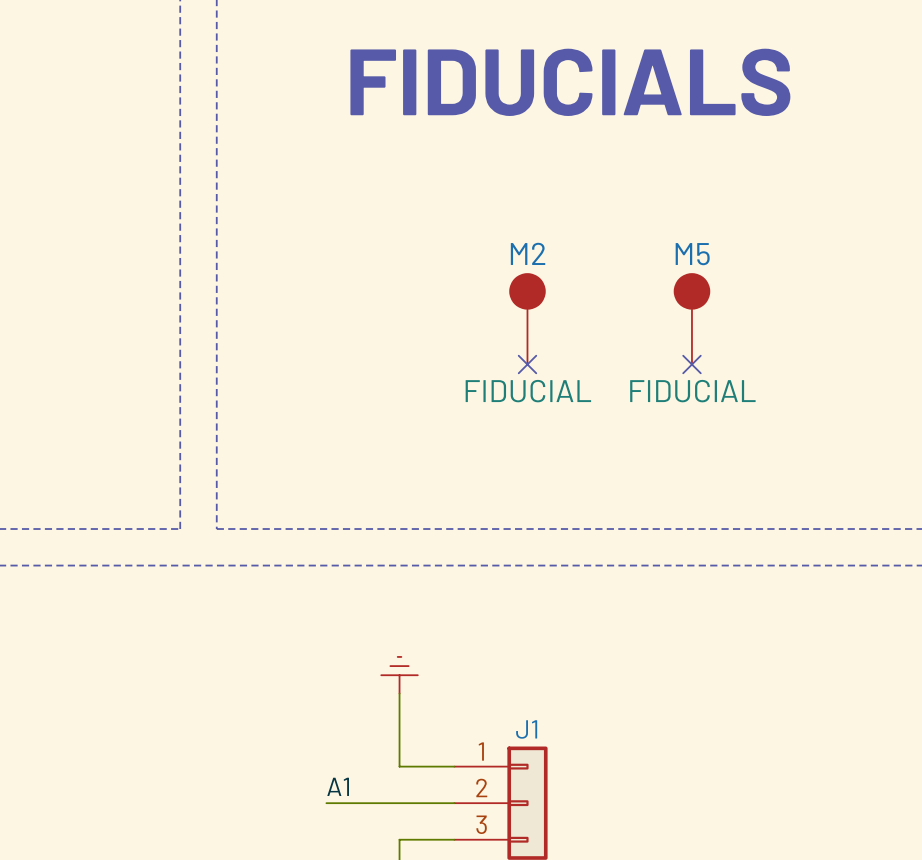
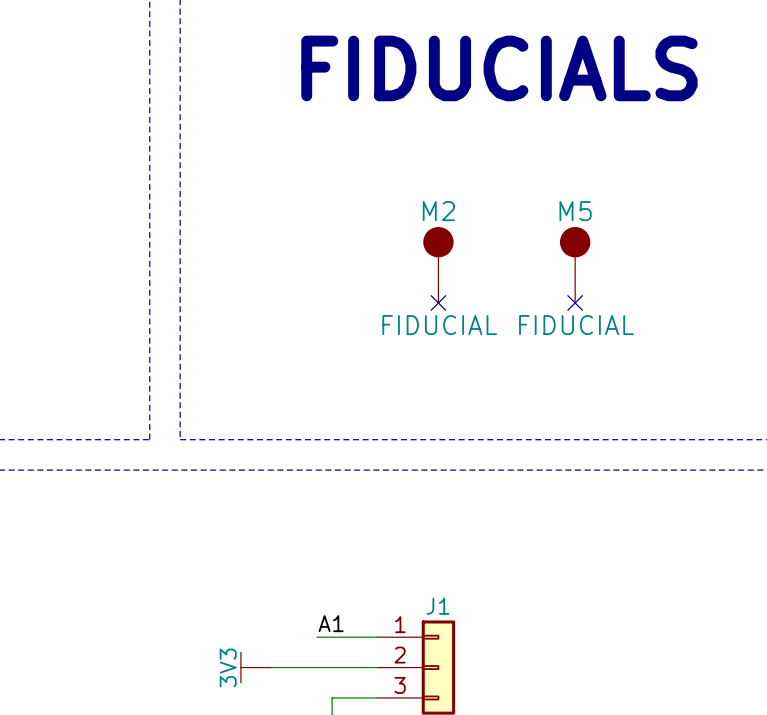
power symbol: (399, 675) -> none
wire: (399, 693) (399, 766) -> (316, 637) (332, 637)
label position: A1 (338, 786) -> A1 (331, 623)
power symbol: none -> 3V3 (256, 667)

